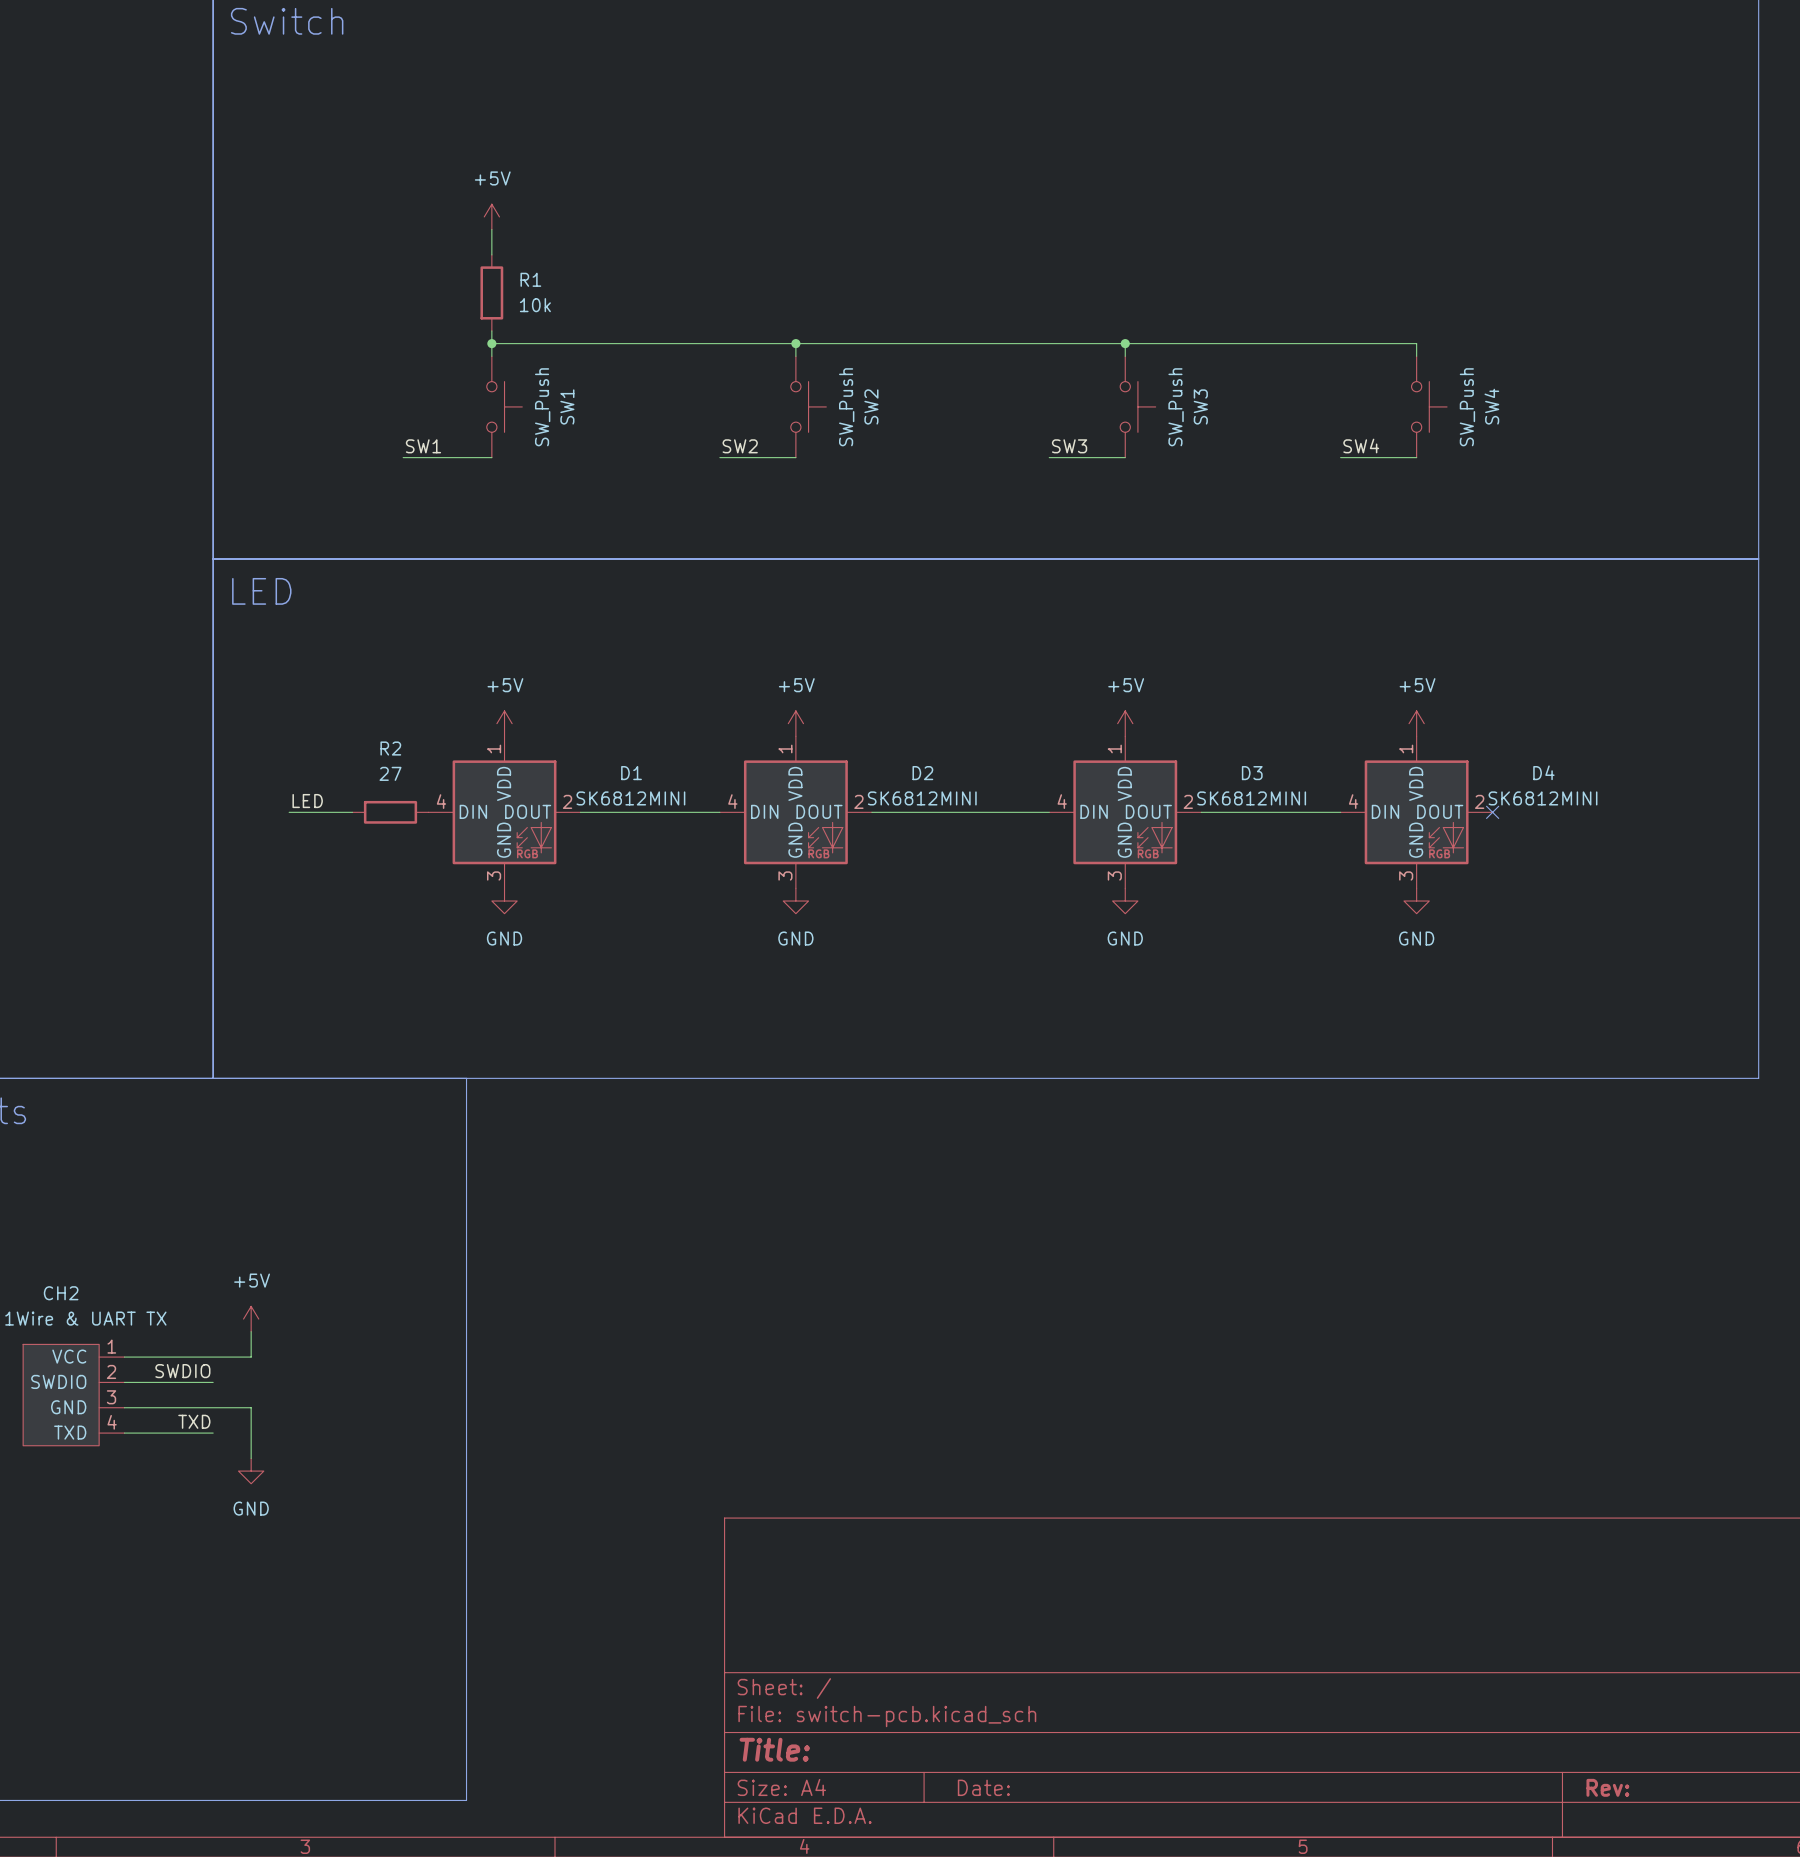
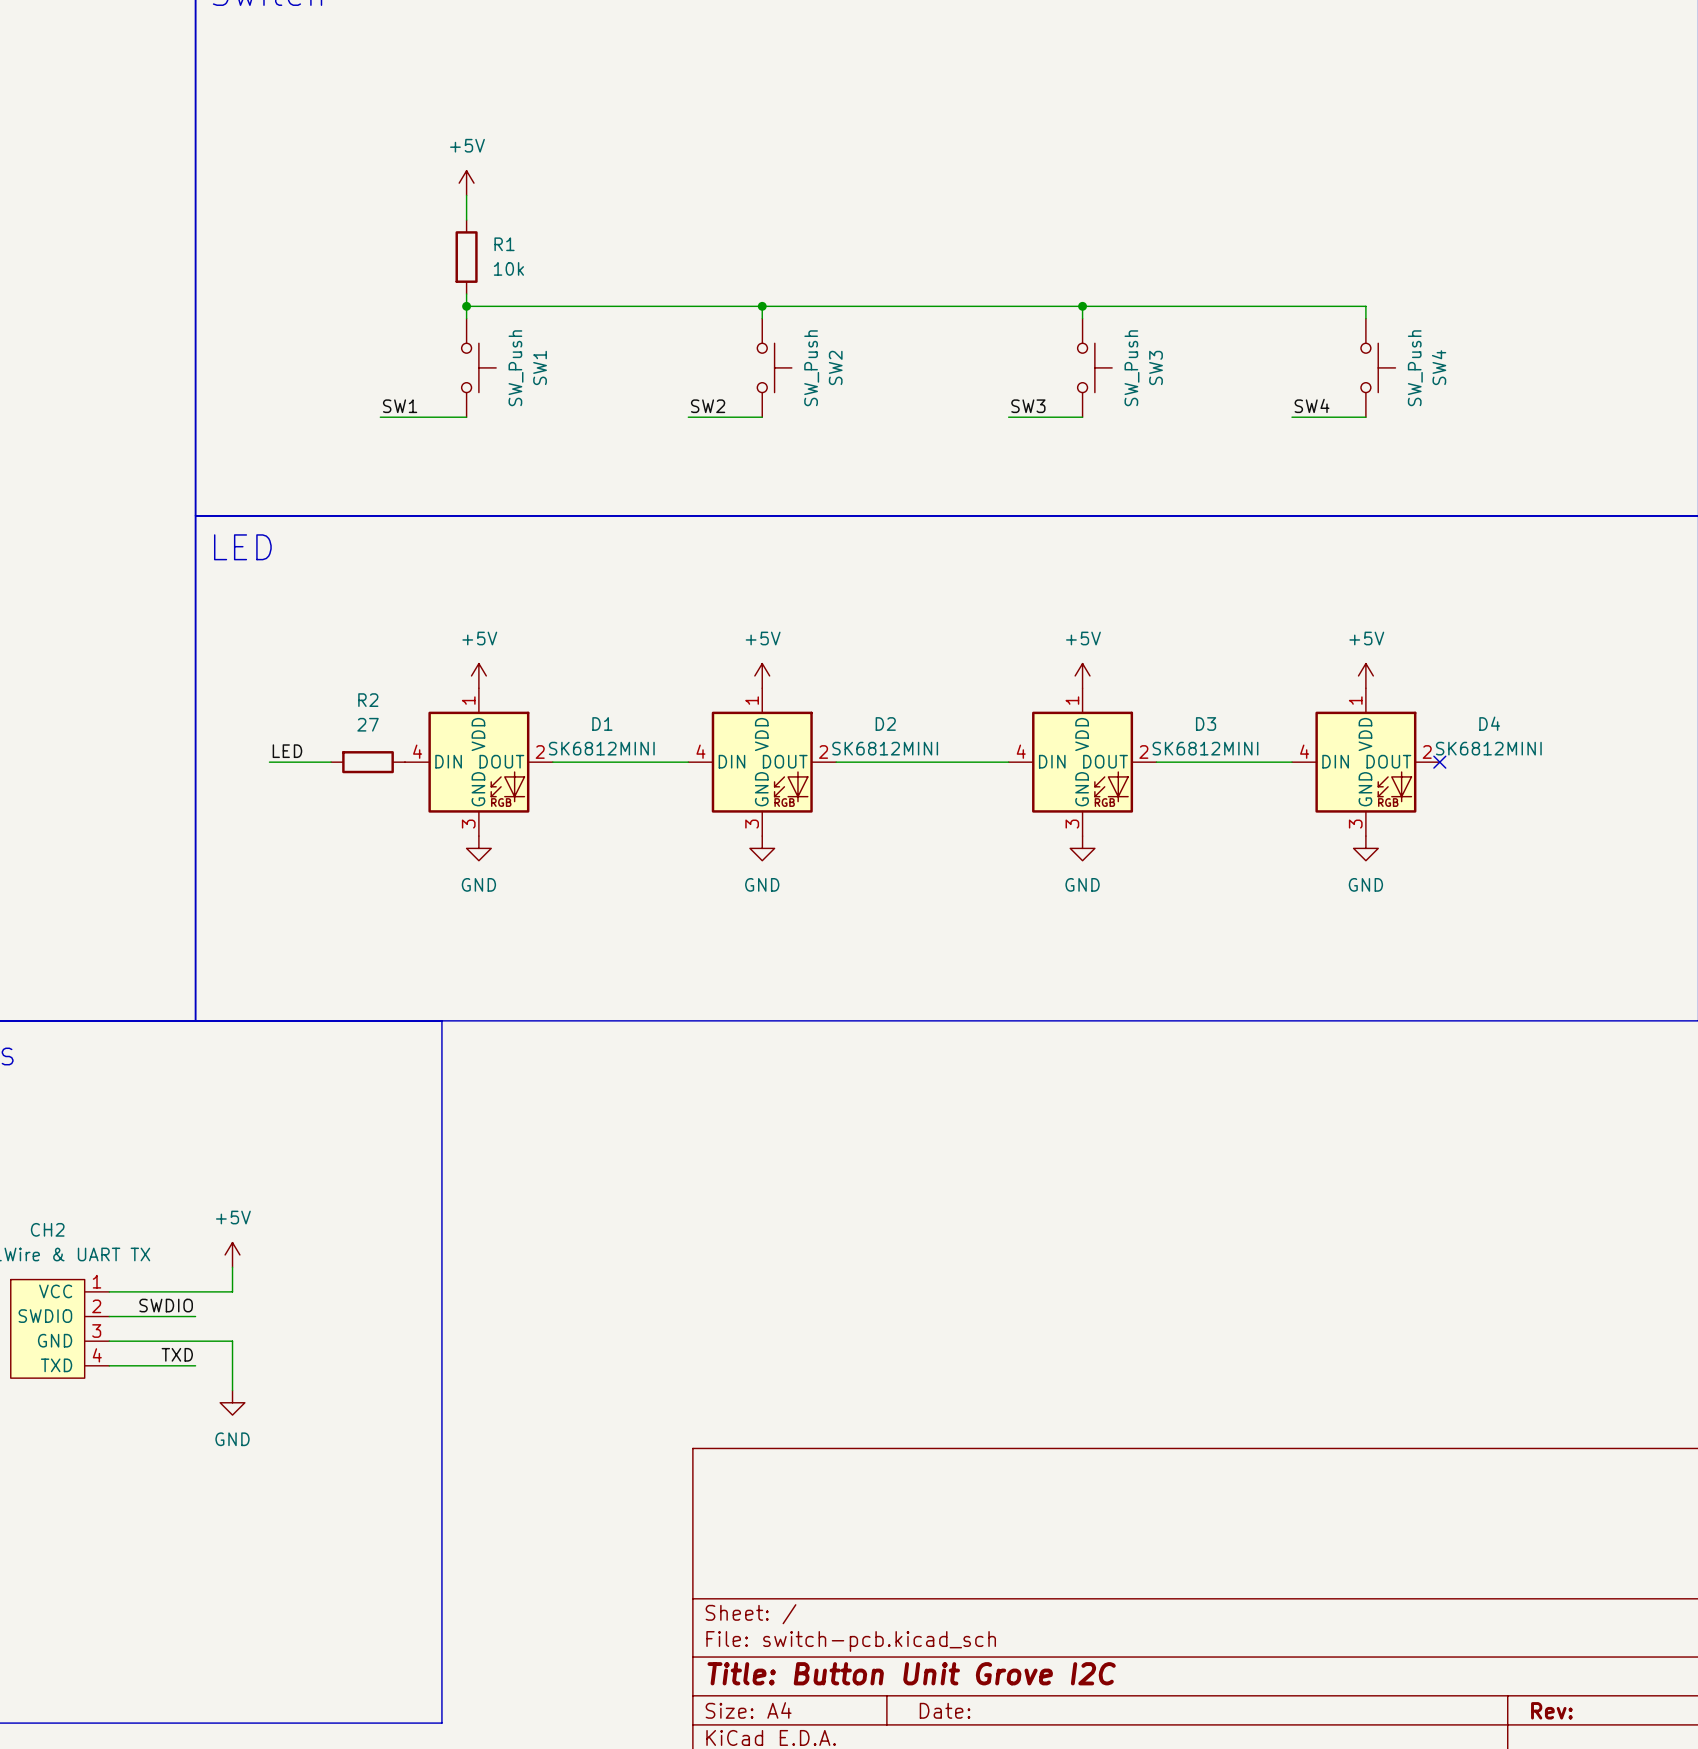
title block: Title: (774, 1749) -> Title: Button Unit Grove I2C (911, 1673)

